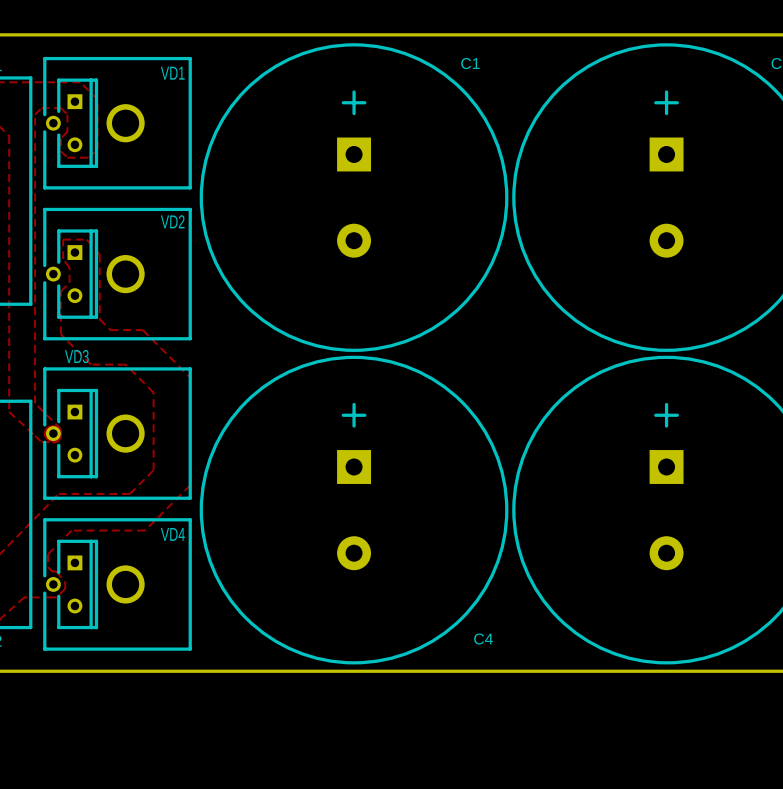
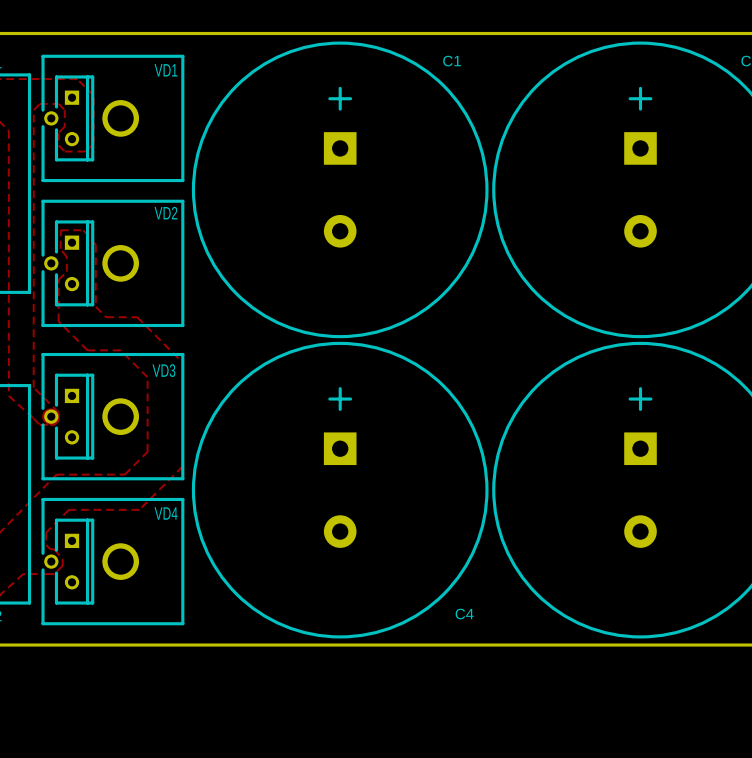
VD3 name position: VD3 (76, 356) -> VD3 (163, 370)

